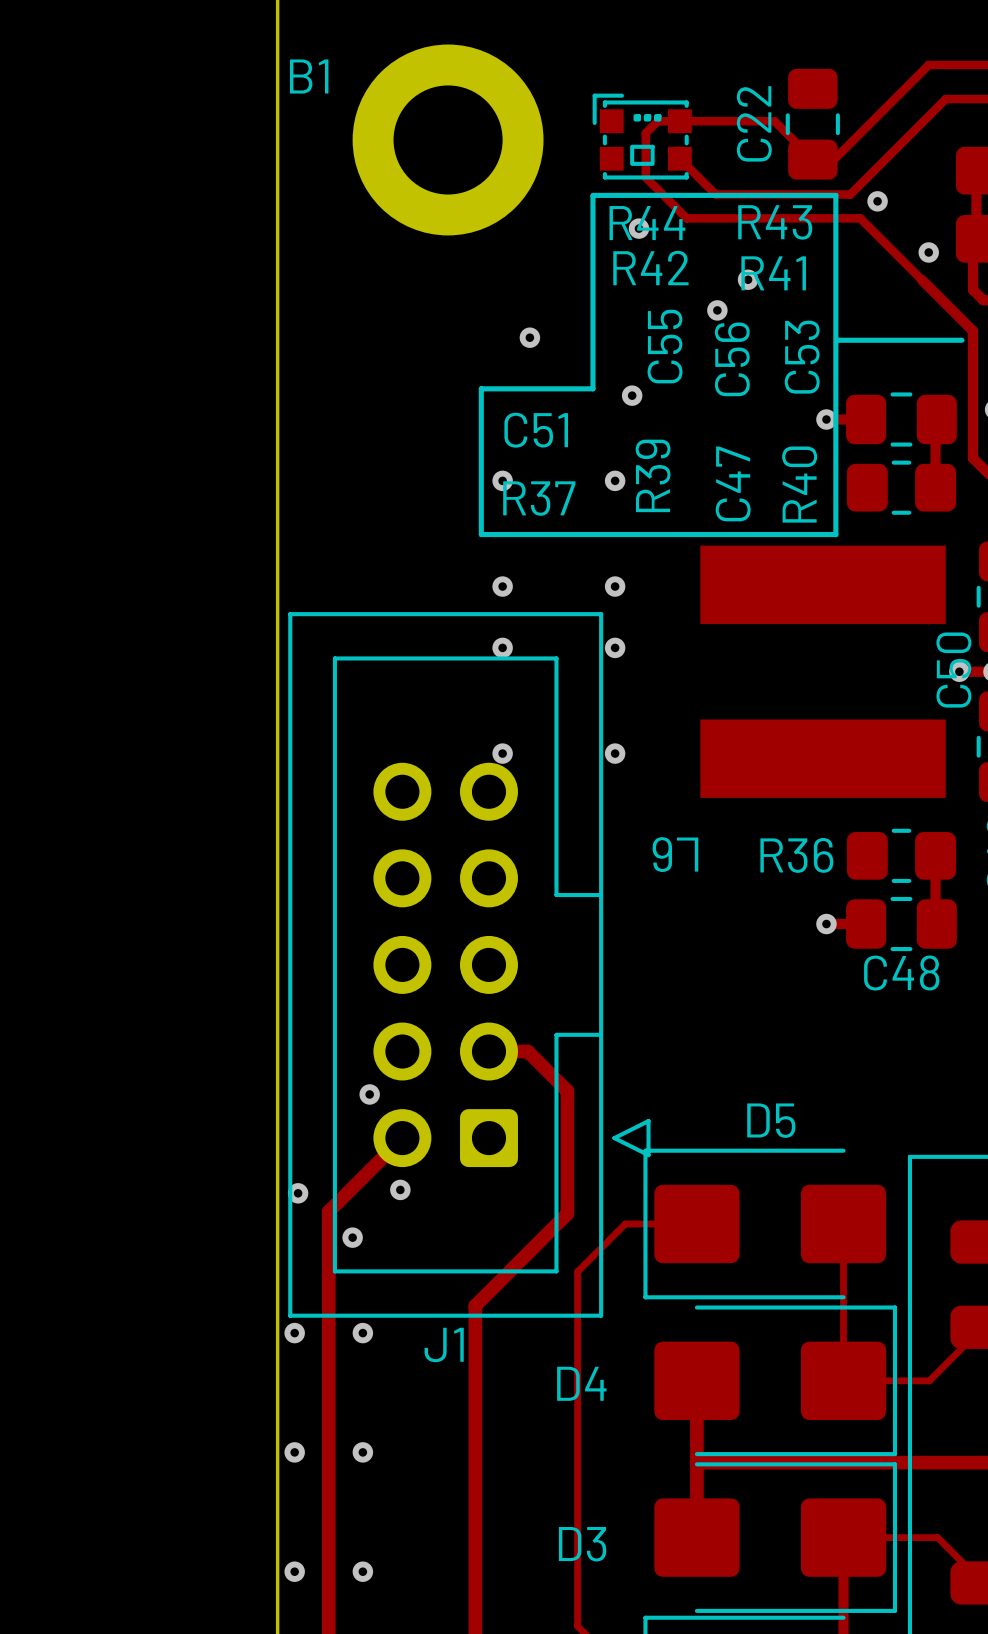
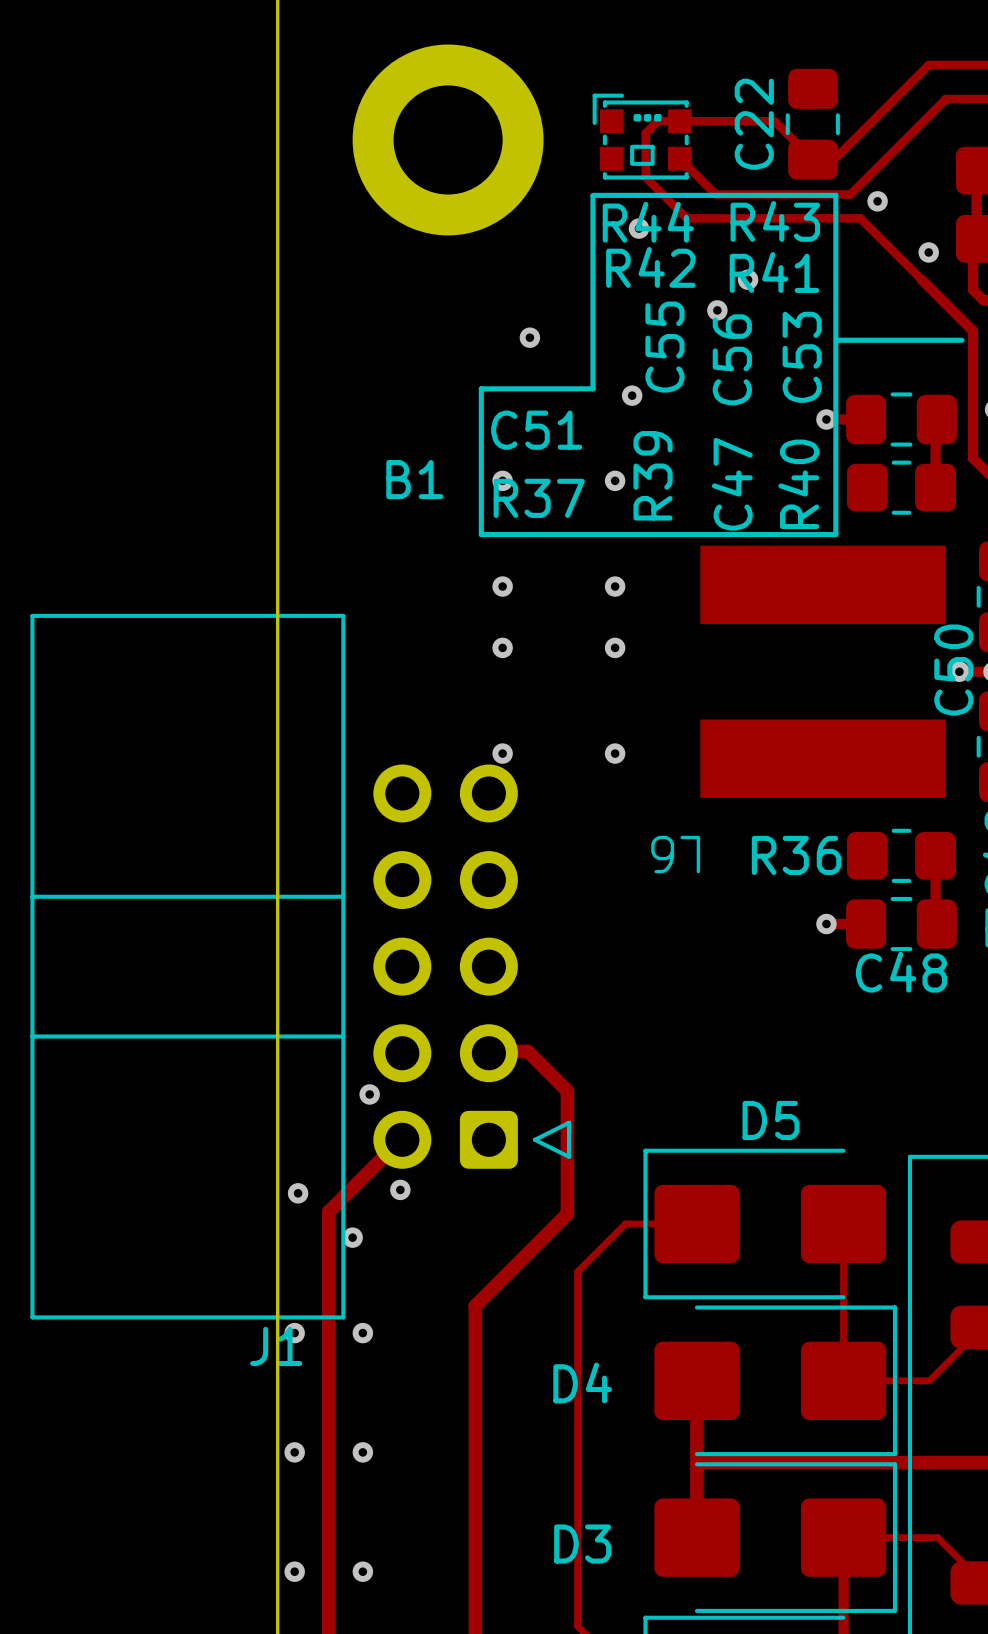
B1 name position: B1 (309, 76) -> B1 (414, 479)
J1 footprint: [288, 612, 651, 1318] -> [30, 613, 572, 1320]

